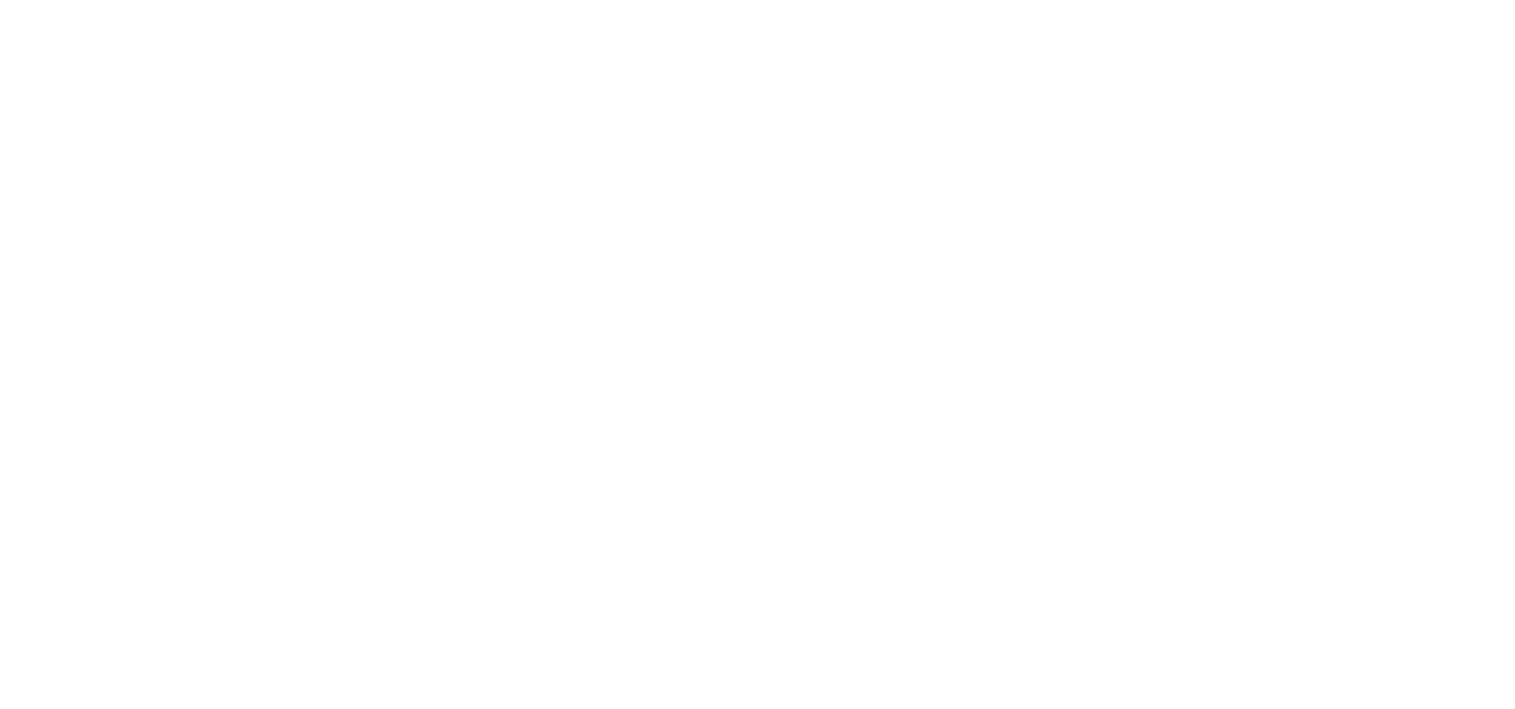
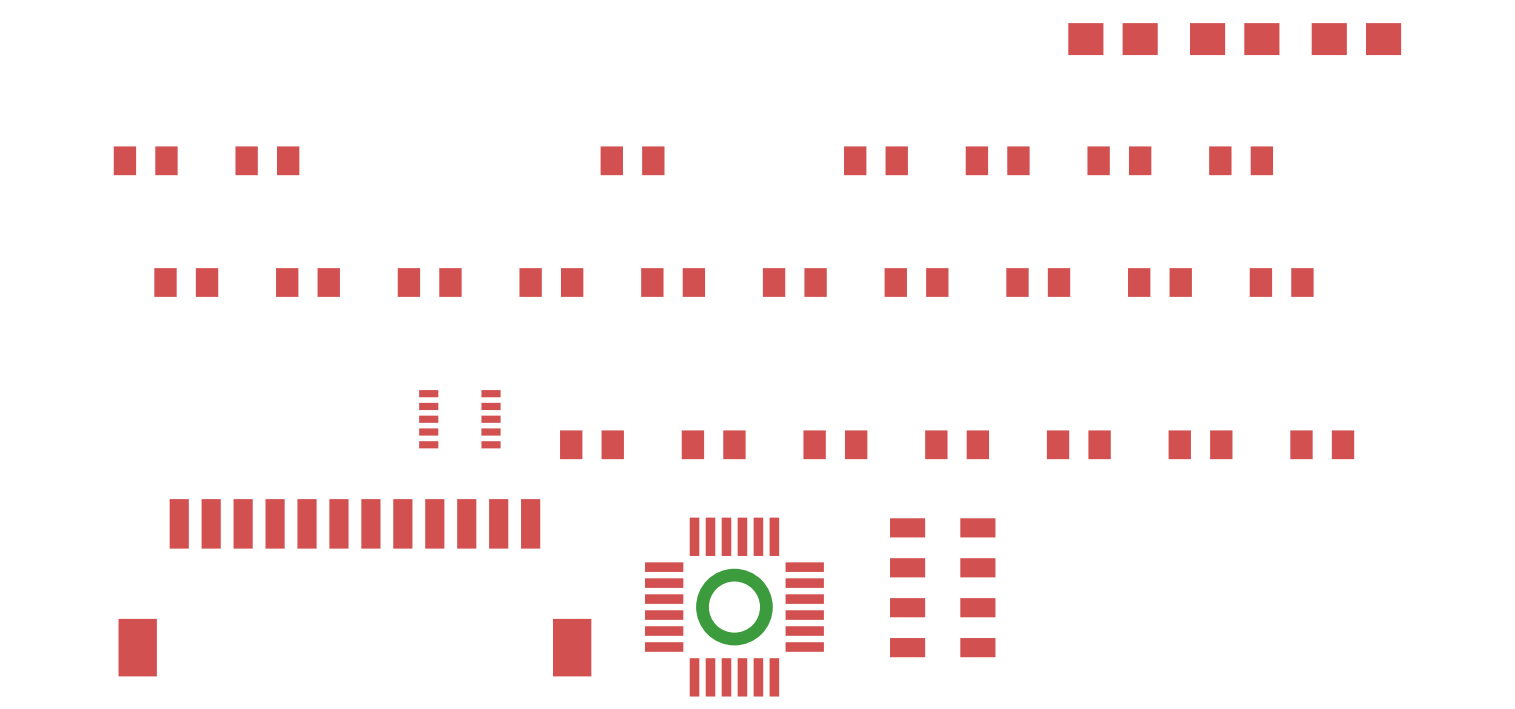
part: none -> (1113, 39)
part: none -> (1234, 39)
part: none -> (1356, 39)
part: none -> (145, 160)
part: none -> (267, 160)
part: none -> (632, 160)
part: none -> (875, 160)
part: none -> (997, 160)
part: none -> (1119, 160)
part: none -> (1241, 160)
part: none -> (186, 282)
part: none -> (307, 282)
part: none -> (429, 282)
part: none -> (551, 282)
part: none -> (673, 282)
part: none -> (794, 282)
part: none -> (916, 282)
part: none -> (1038, 282)
part: none -> (1159, 282)
part: none -> (1281, 282)
part: none -> (459, 419)
part: none -> (591, 444)
part: none -> (713, 444)
part: none -> (835, 444)
part: none -> (957, 444)
part: none -> (1078, 444)
part: none -> (1200, 444)
part: none -> (1322, 444)
part: none -> (354, 587)
part: none -> (942, 587)
part: none -> (734, 607)

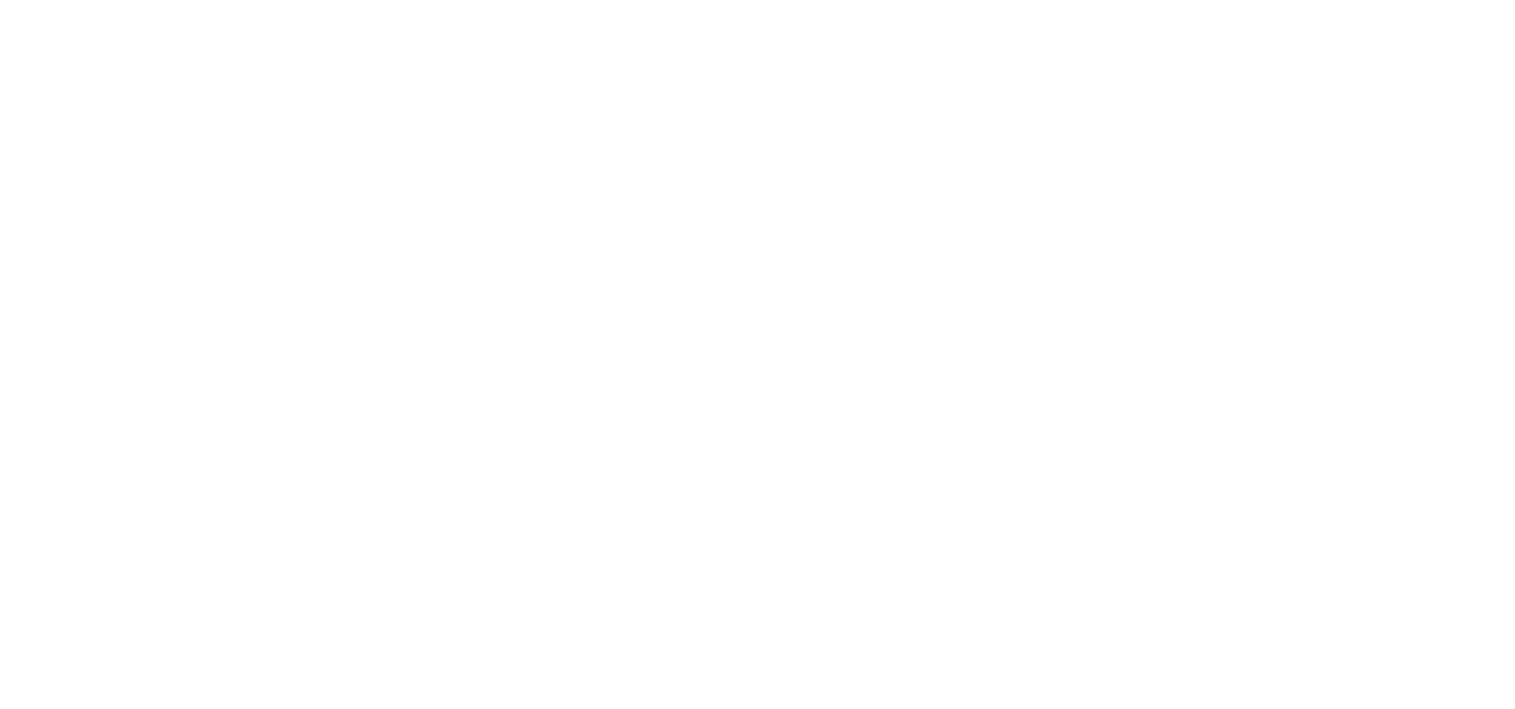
part: (1113, 39) -> none
part: (1234, 39) -> none
part: (1356, 39) -> none
part: (145, 160) -> none
part: (267, 160) -> none
part: (632, 160) -> none
part: (875, 160) -> none
part: (997, 160) -> none
part: (1119, 160) -> none
part: (1241, 160) -> none
part: (186, 282) -> none
part: (307, 282) -> none
part: (429, 282) -> none
part: (551, 282) -> none
part: (673, 282) -> none
part: (794, 282) -> none
part: (916, 282) -> none
part: (1038, 282) -> none
part: (1159, 282) -> none
part: (1281, 282) -> none
part: (459, 419) -> none
part: (591, 444) -> none
part: (713, 444) -> none
part: (835, 444) -> none
part: (957, 444) -> none
part: (1078, 444) -> none
part: (1200, 444) -> none
part: (1322, 444) -> none
part: (354, 587) -> none
part: (942, 587) -> none
part: (734, 607) -> none

